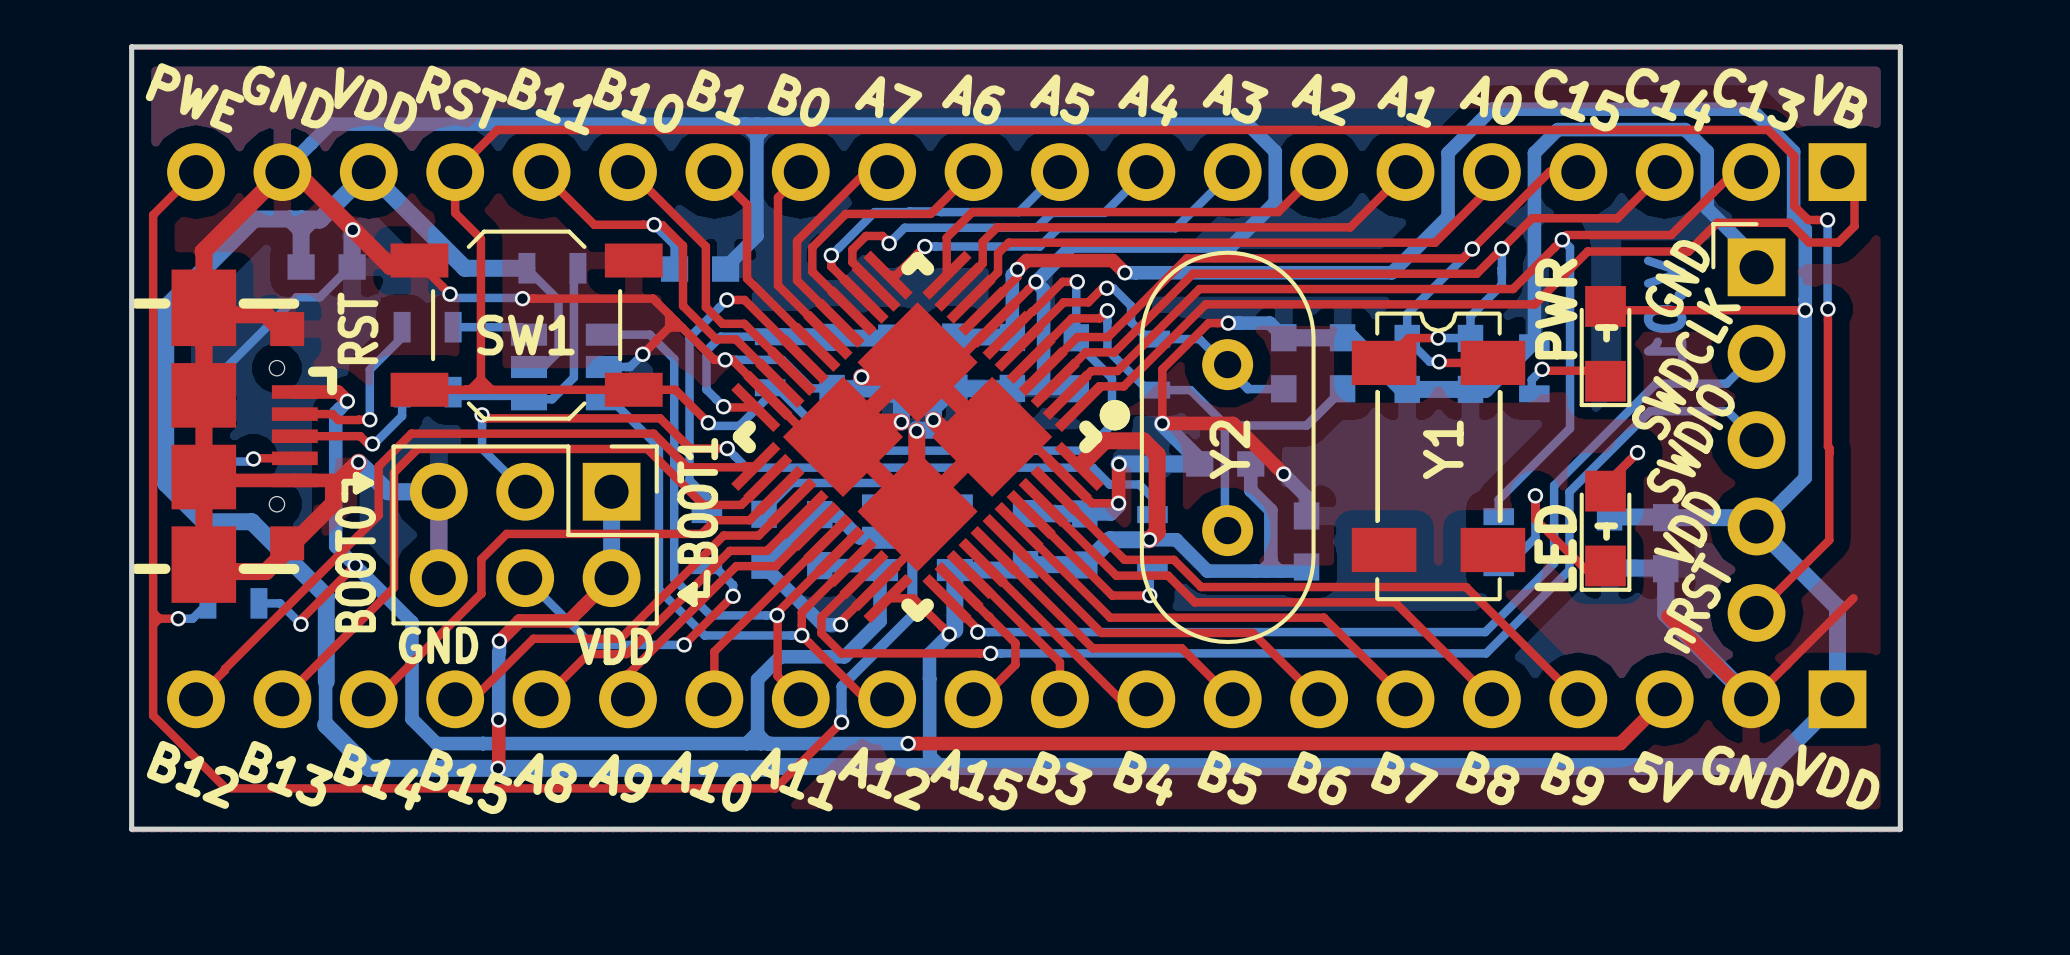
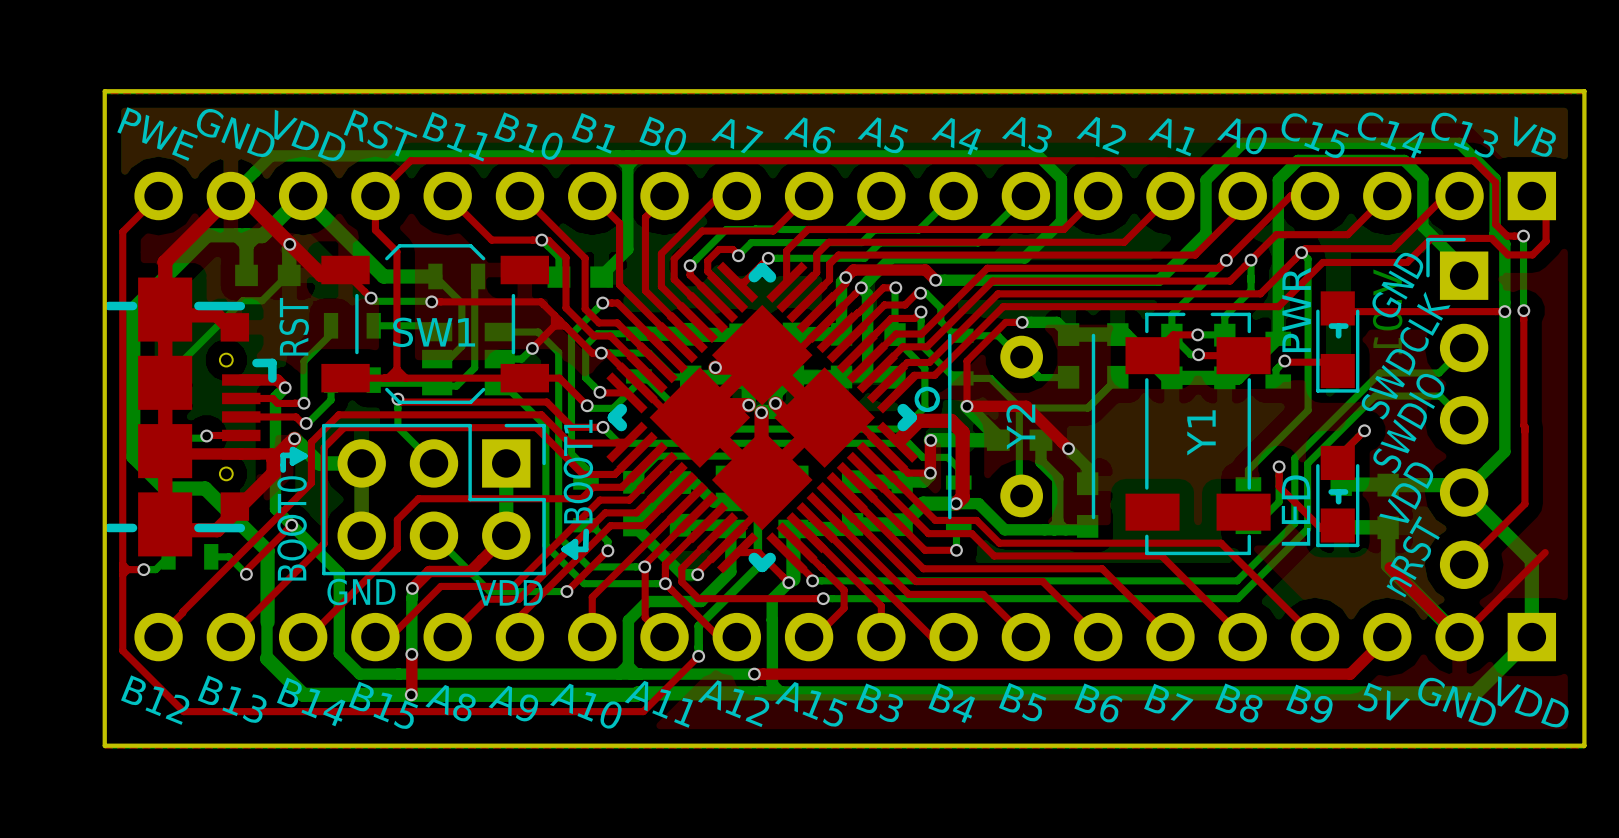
drawing: [1099, 250, 1316, 645] -> none
drawing: [1375, 311, 1502, 602] -> none
Y2 footprint: [1202, 339, 1254, 557] -> [948, 333, 1096, 520]
Y1 footprint: [1351, 340, 1526, 573] -> [1125, 312, 1271, 556]

